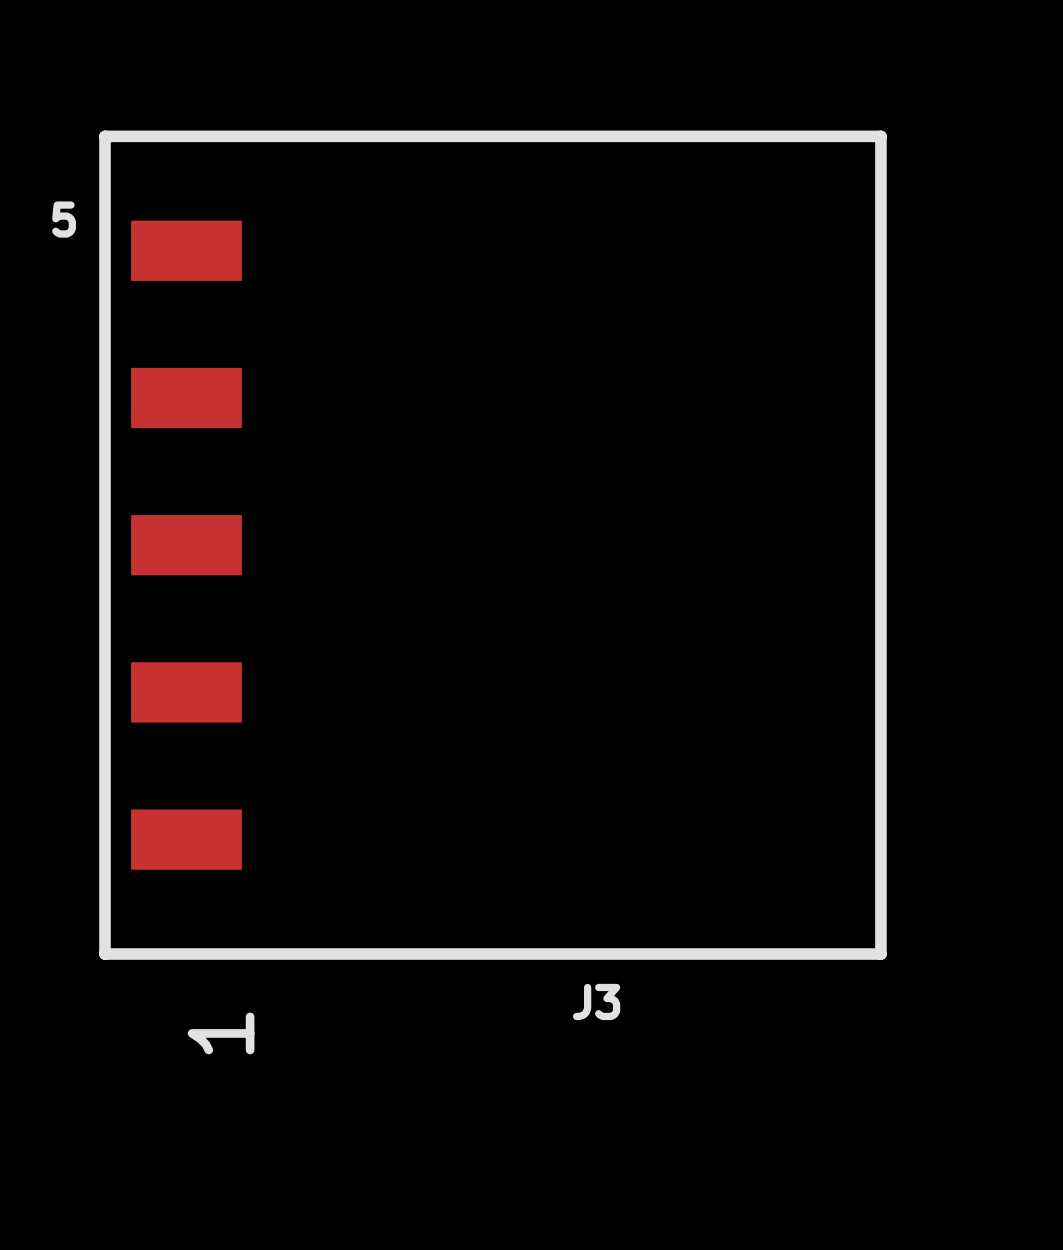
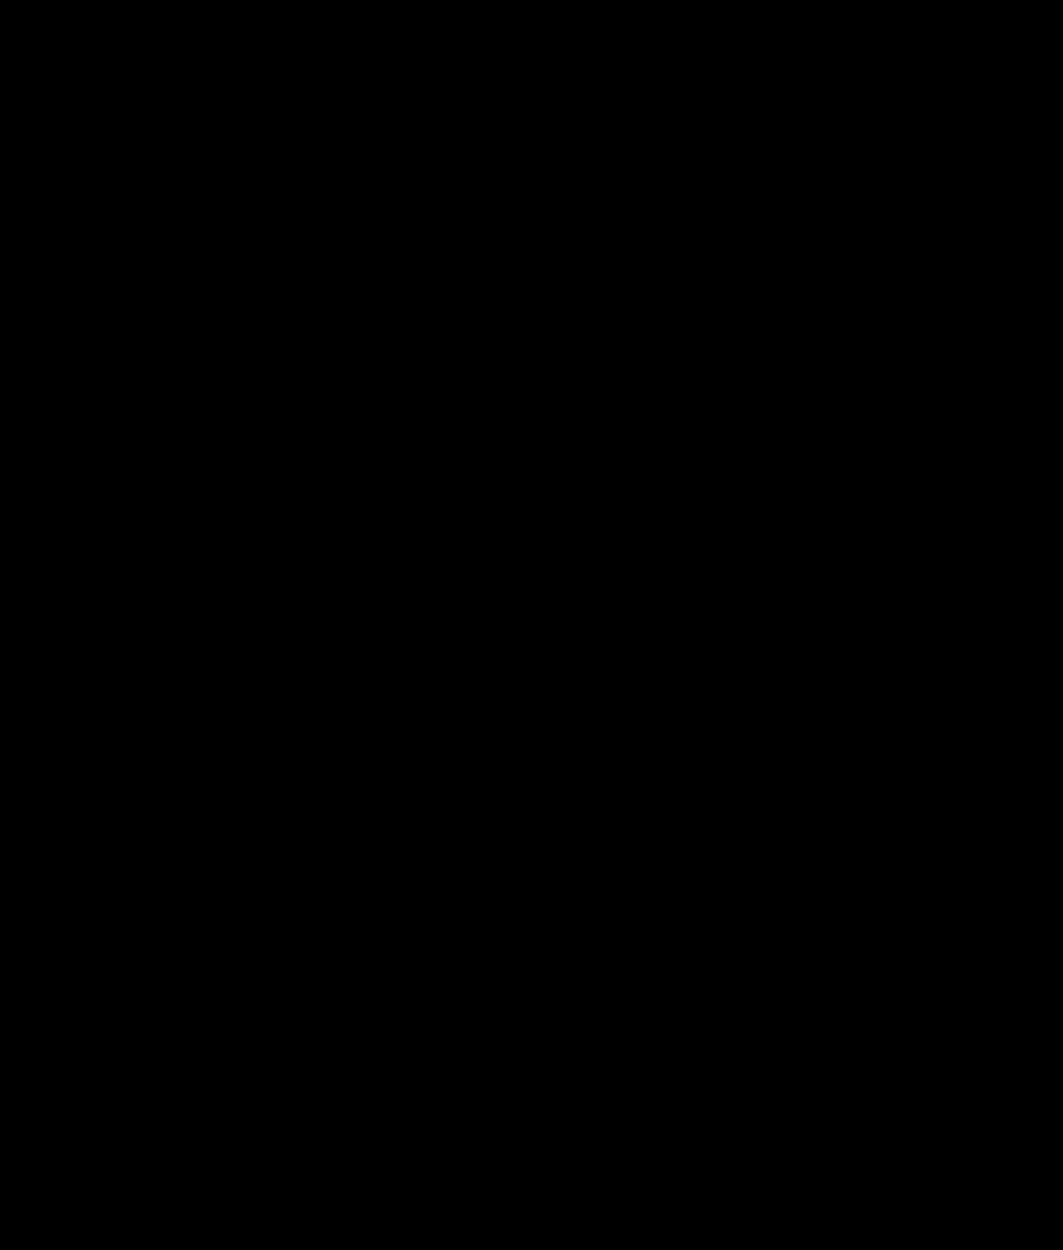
J3: (492, 545) -> none

